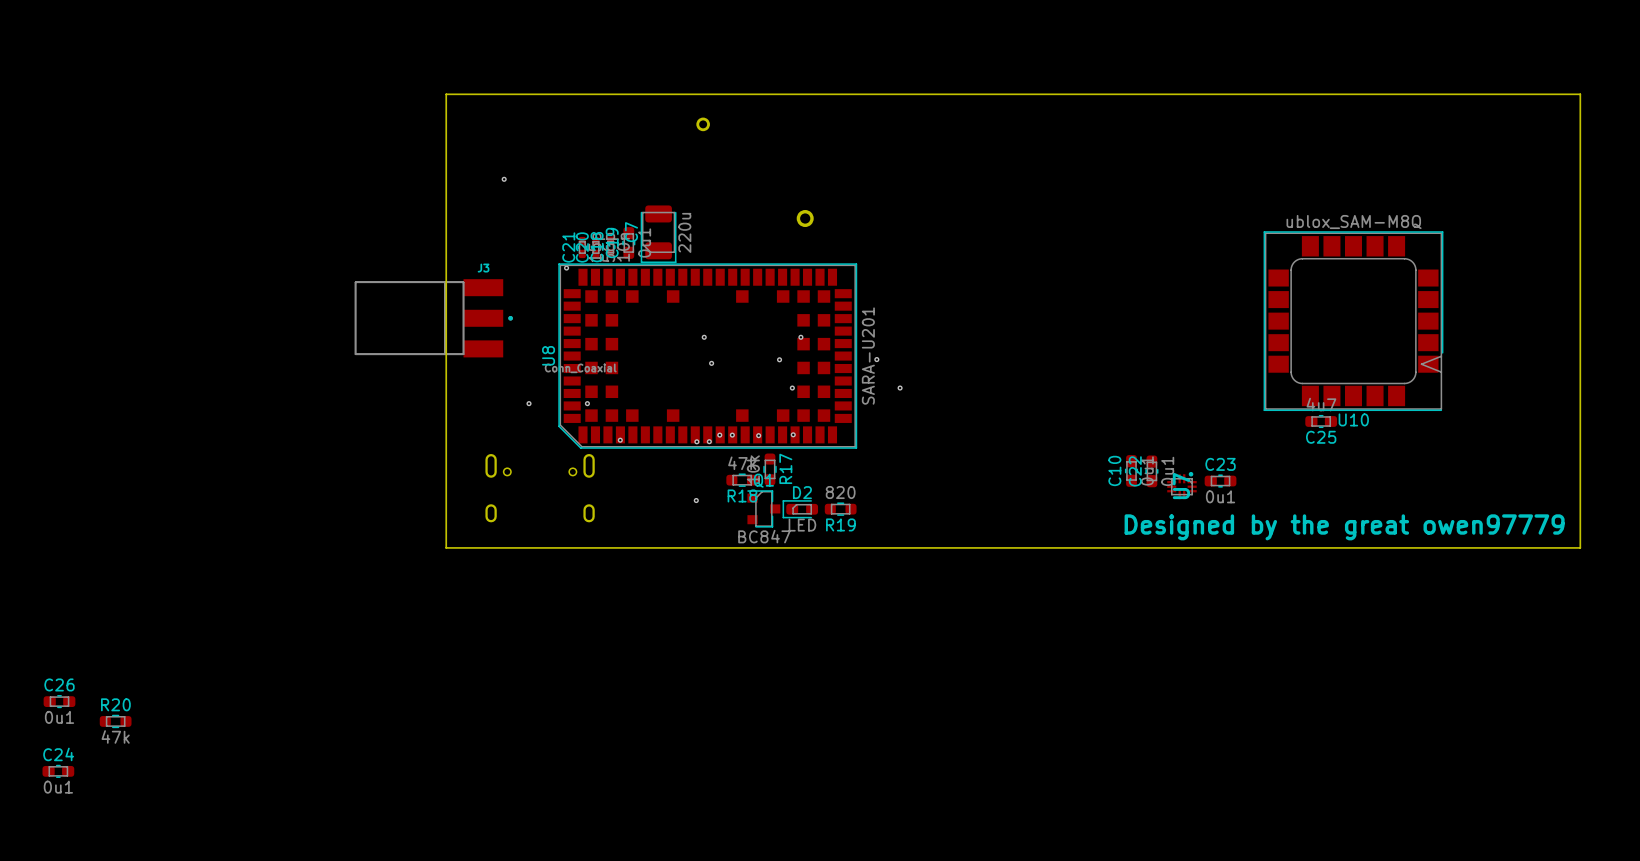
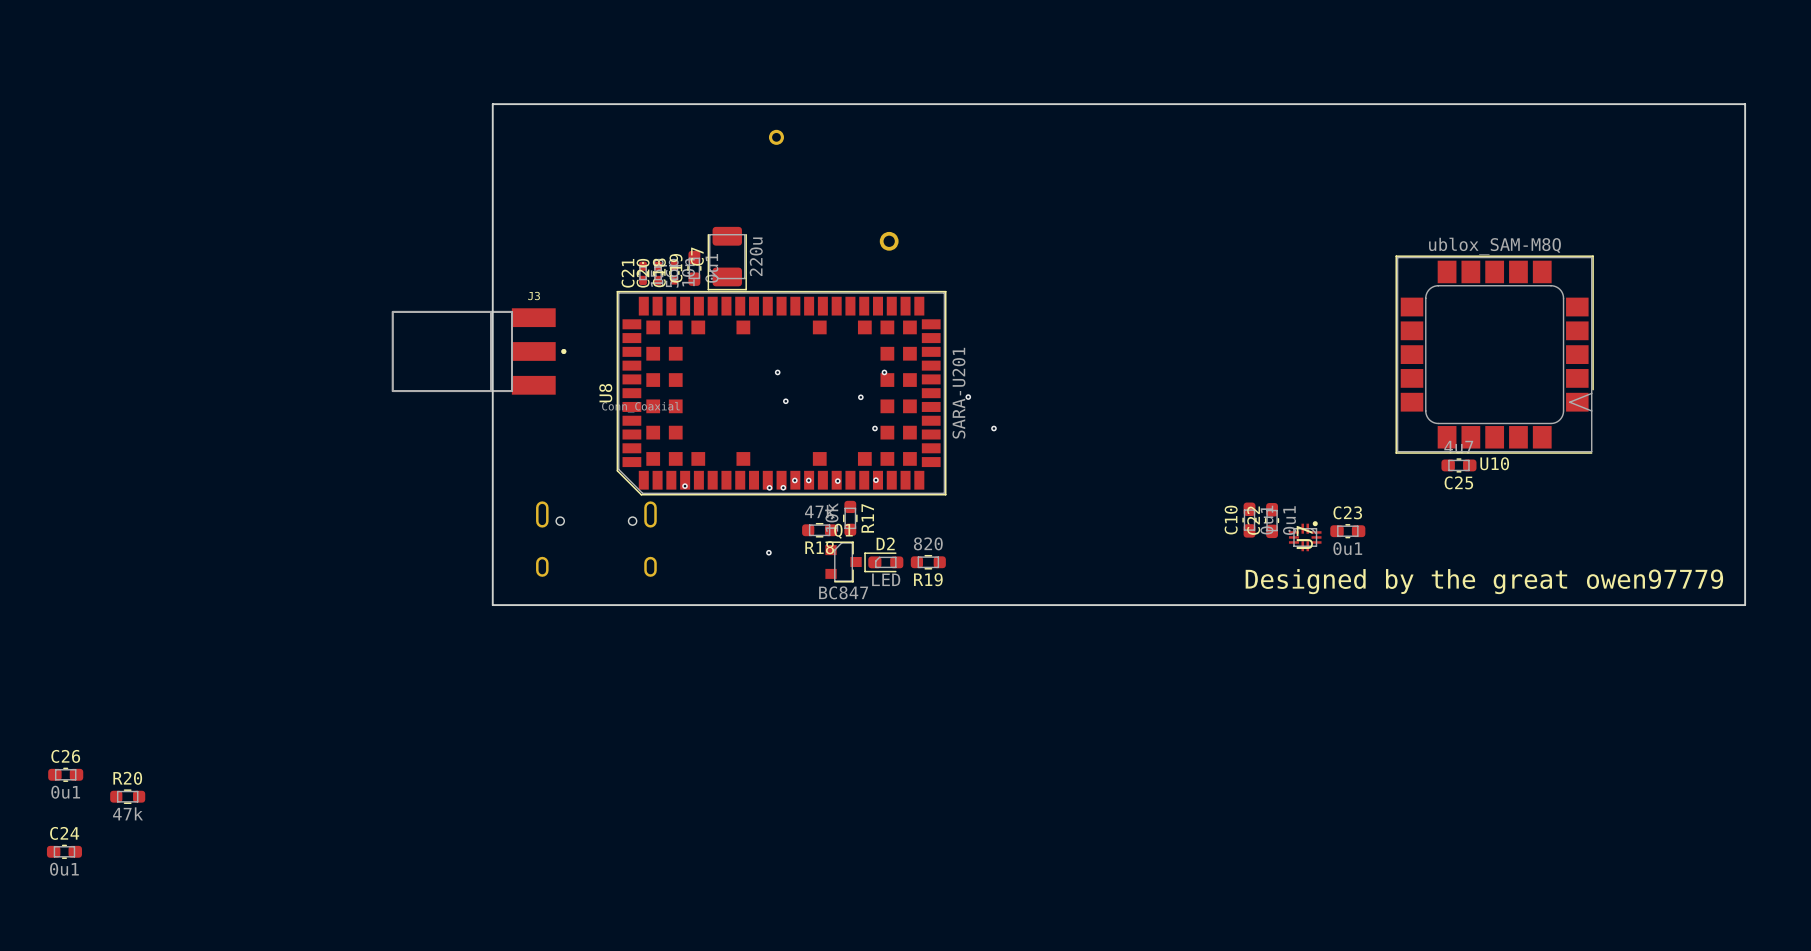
via: (504, 179) -> none
via: (566, 268) -> none
via: (529, 403) -> none
via: (587, 403) -> none

